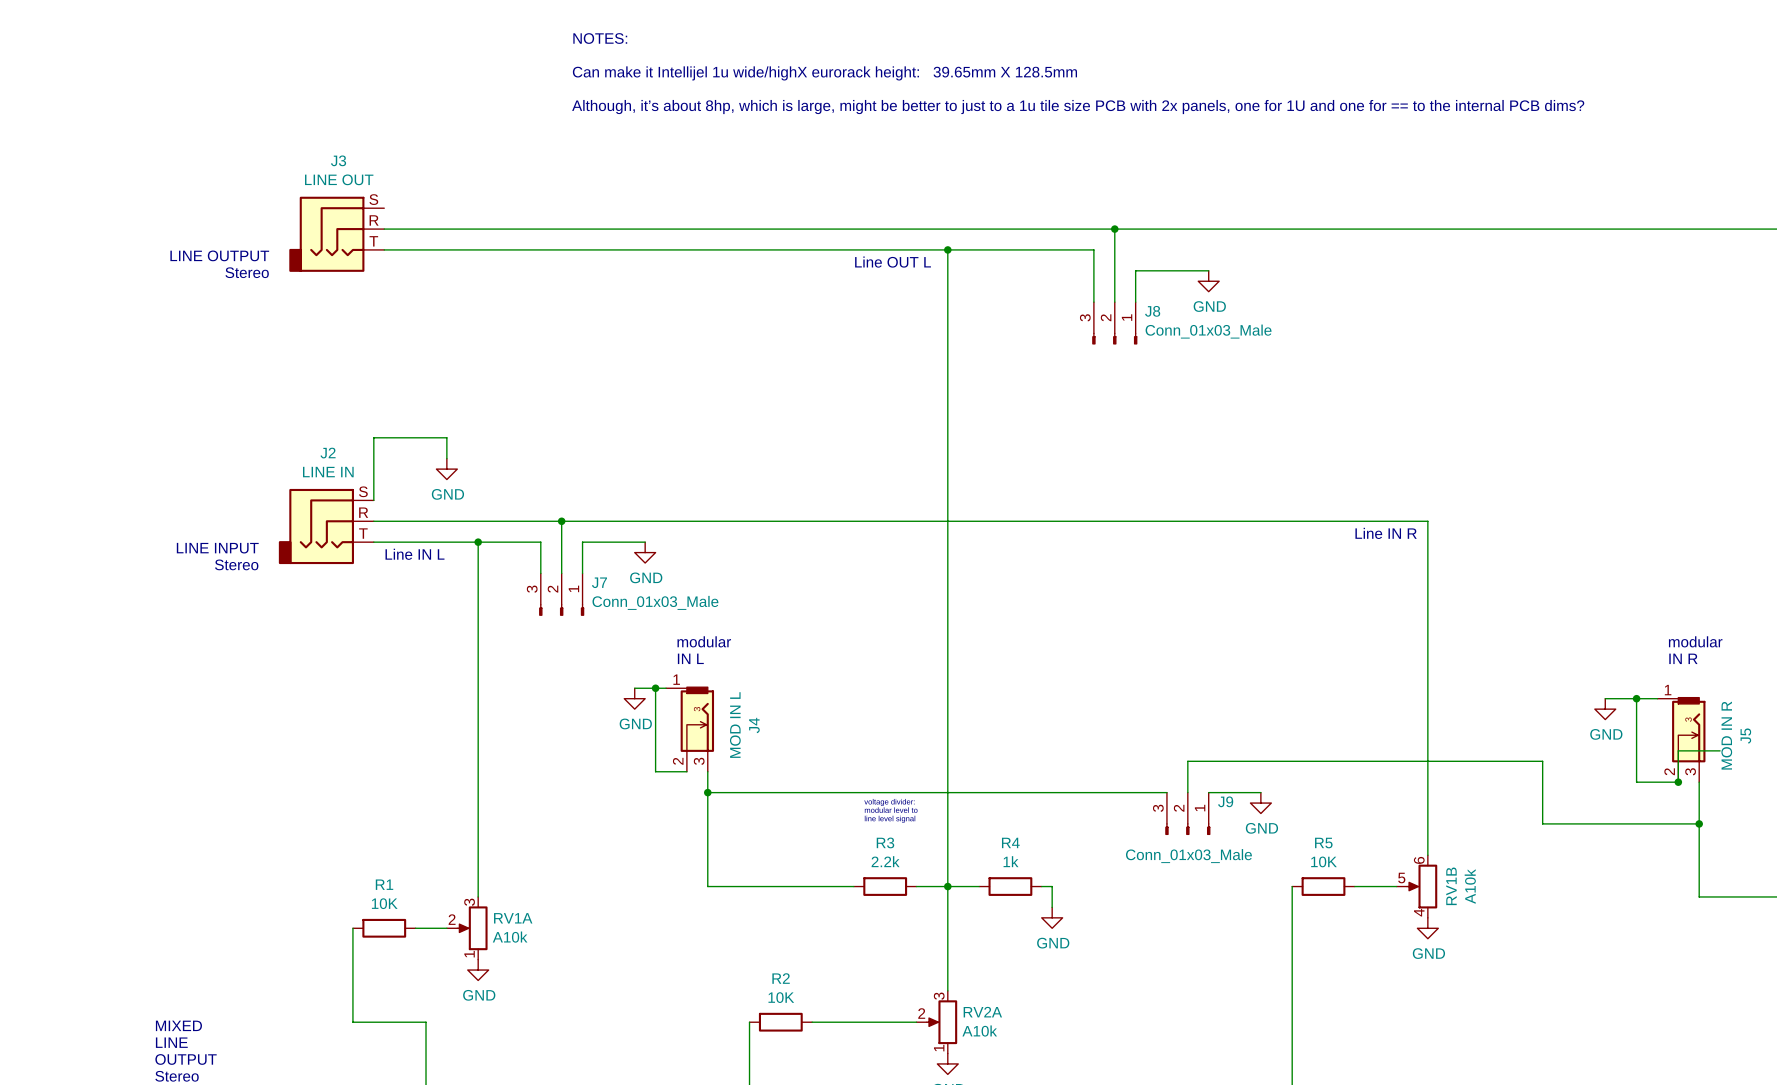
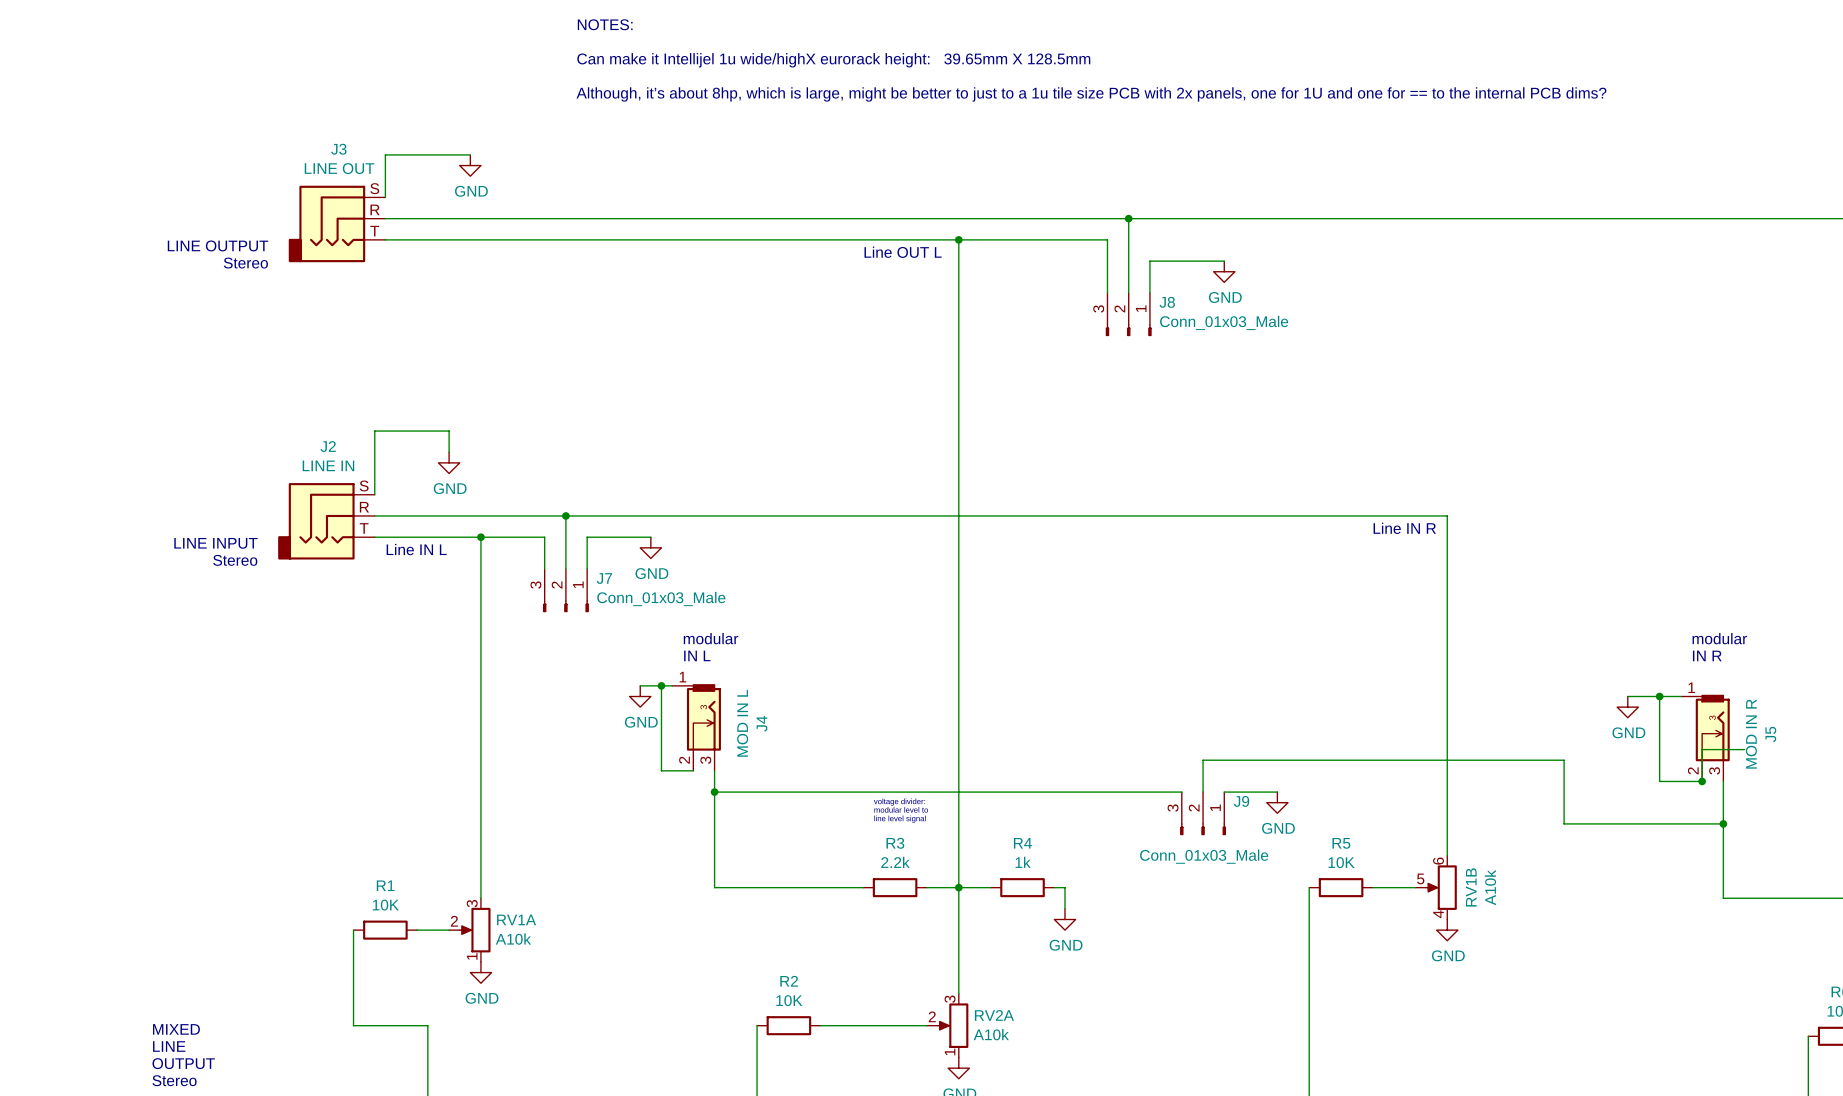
wire: none -> (470, 154) (385, 154) (385, 197)
power symbol: none -> GND (470, 165)

